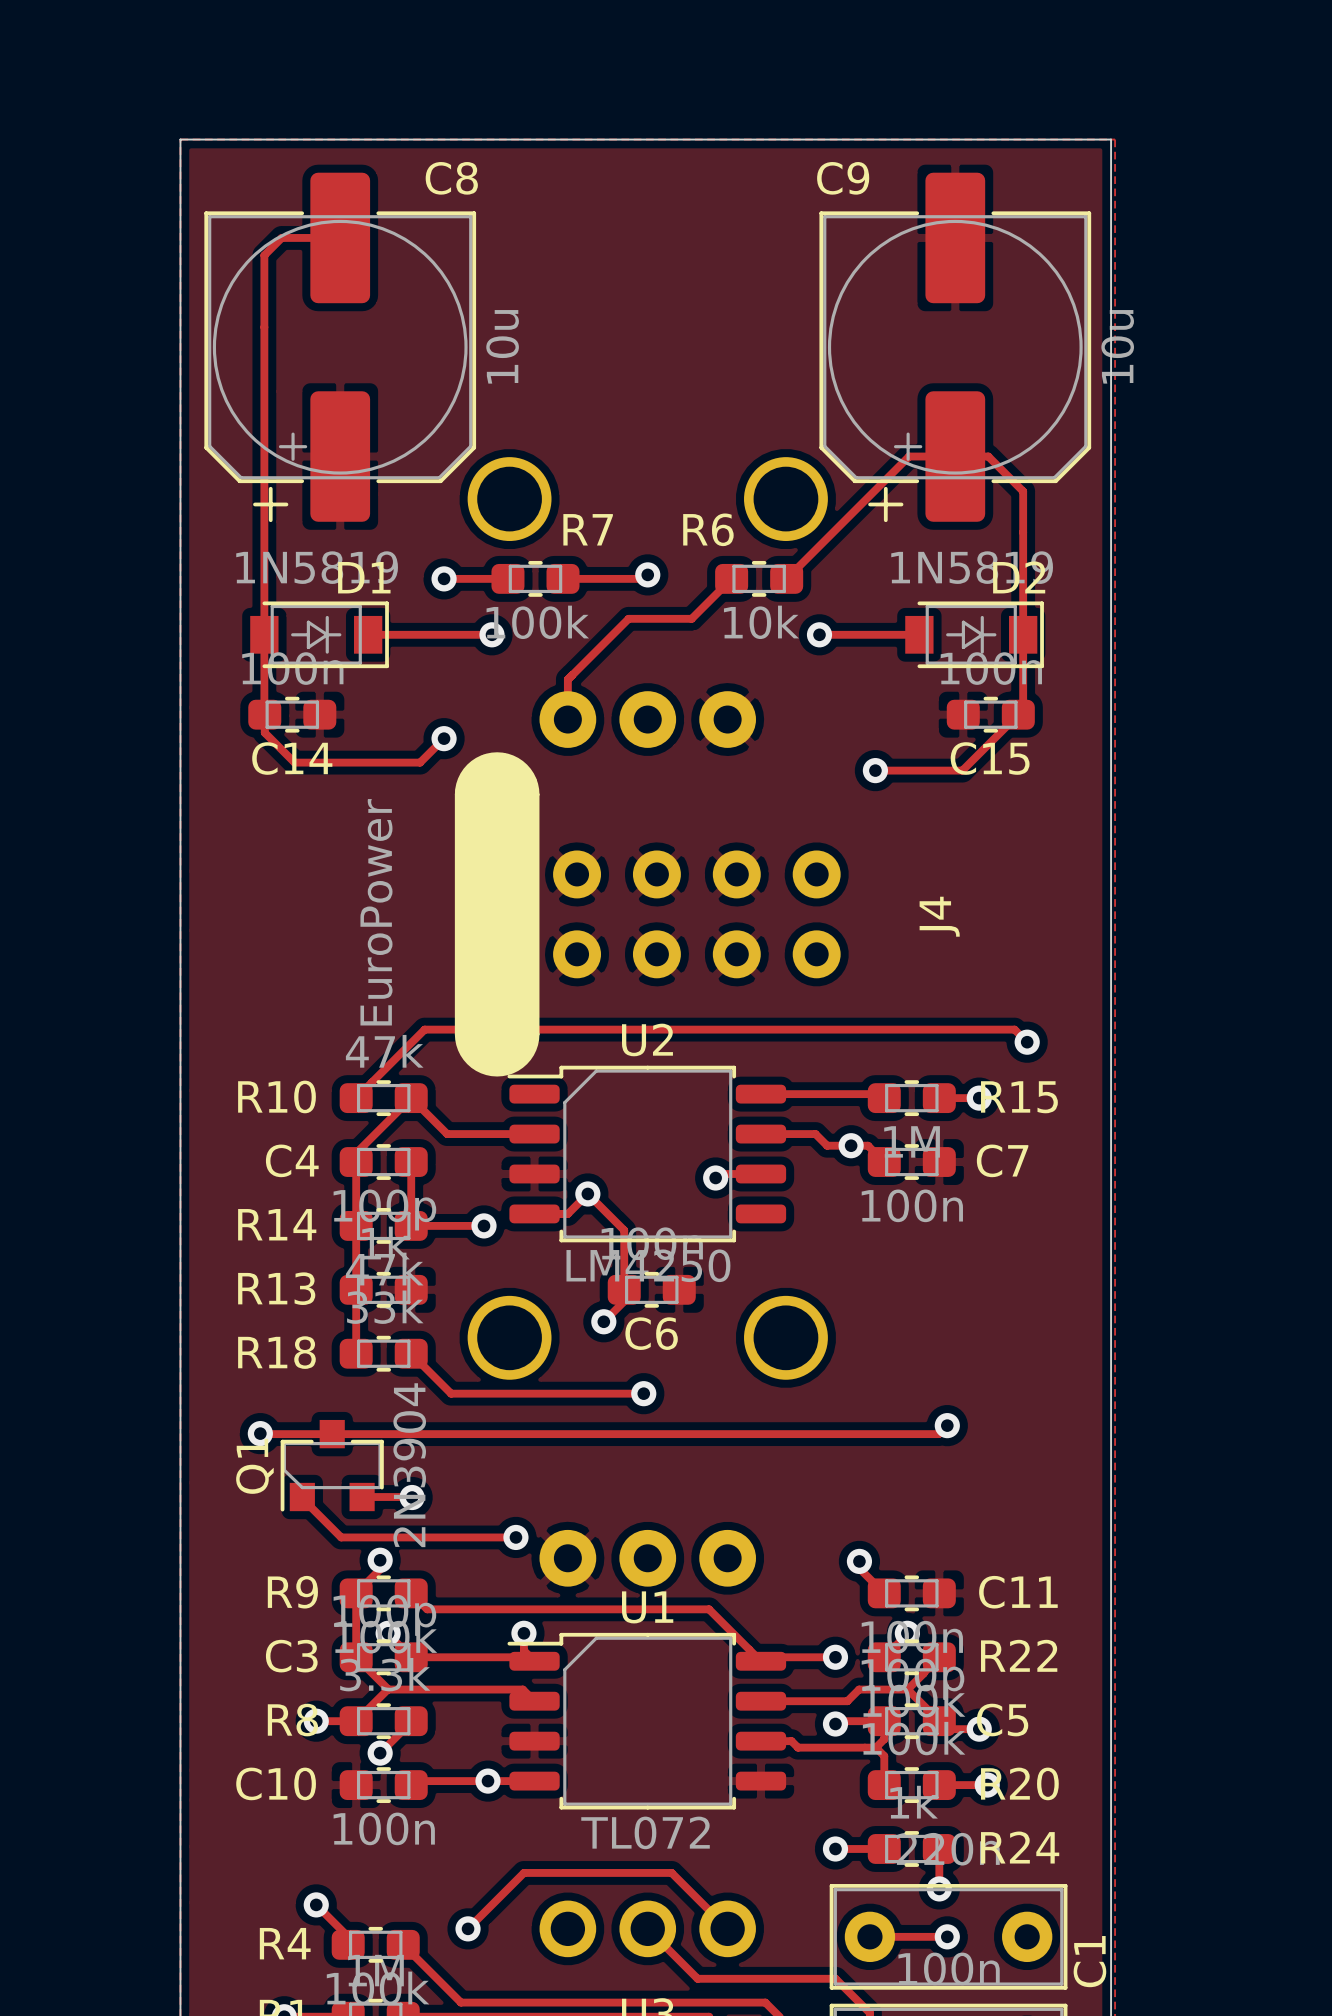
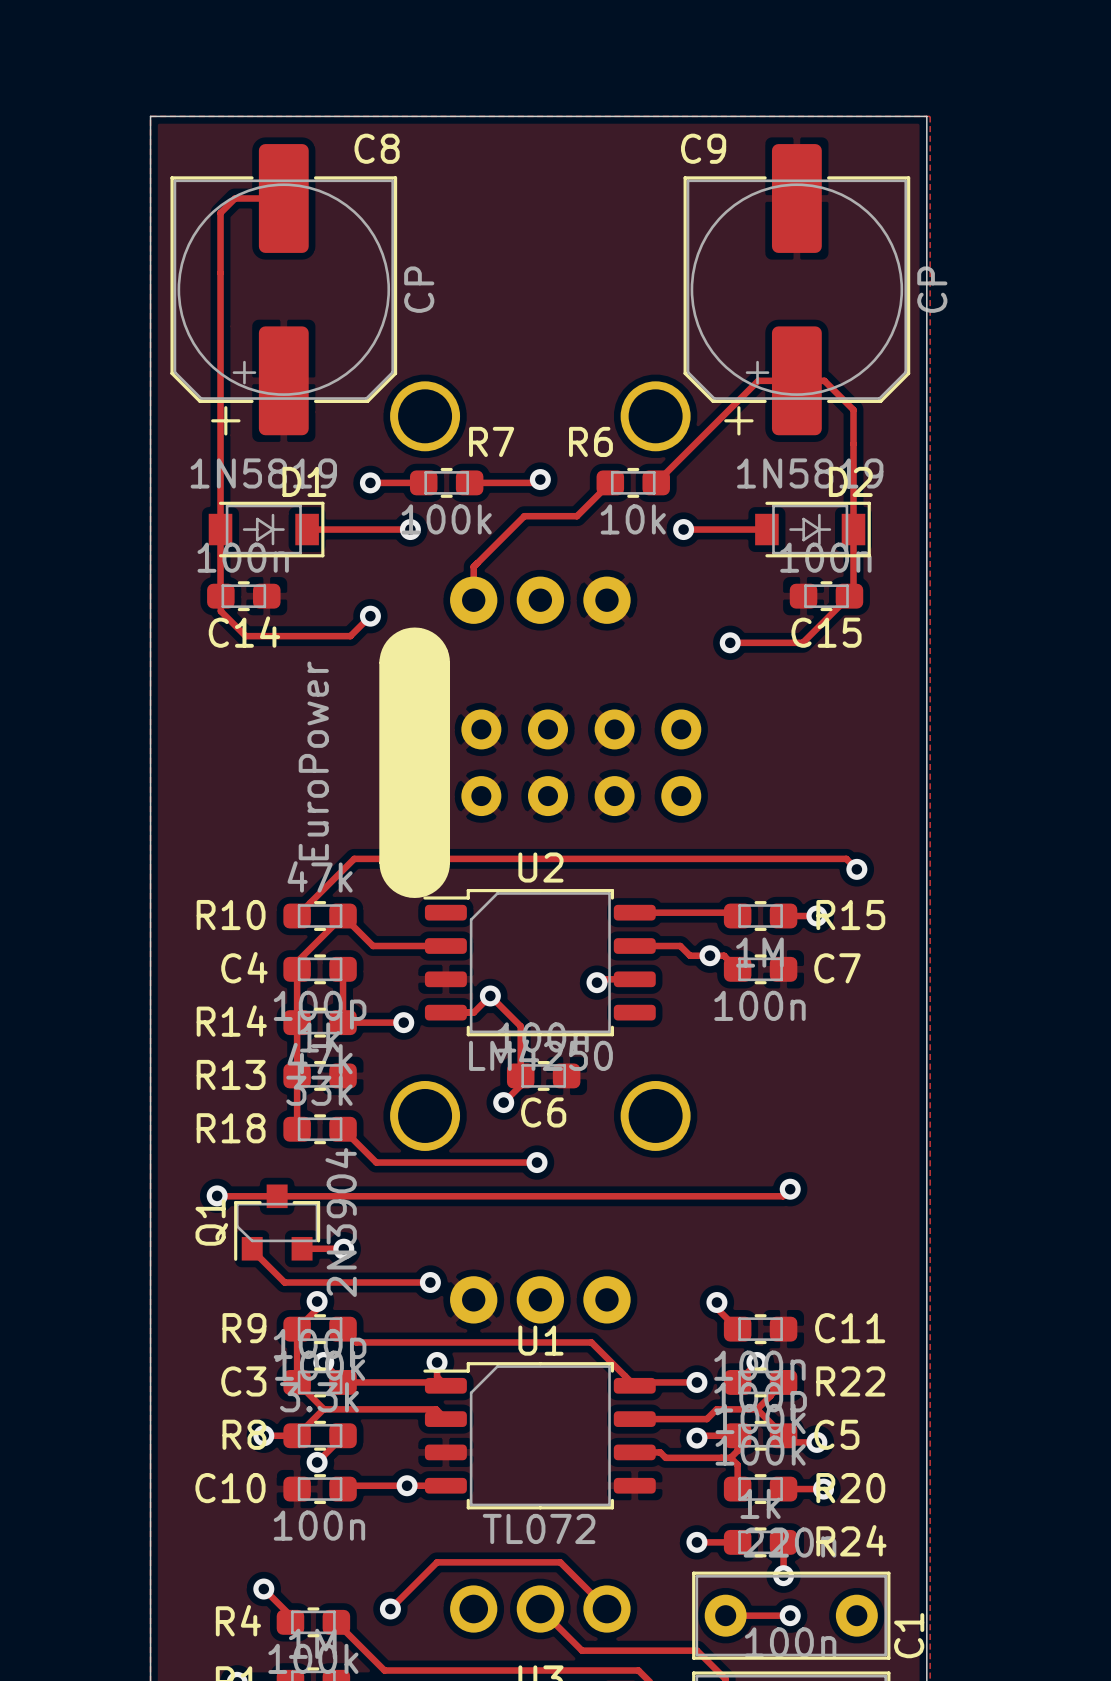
C8 value: 10u (502, 346) -> CP (419, 289)
C9 value: 10u (1117, 346) -> CP (932, 289)
J4 name: J4 (939, 916) -> none

